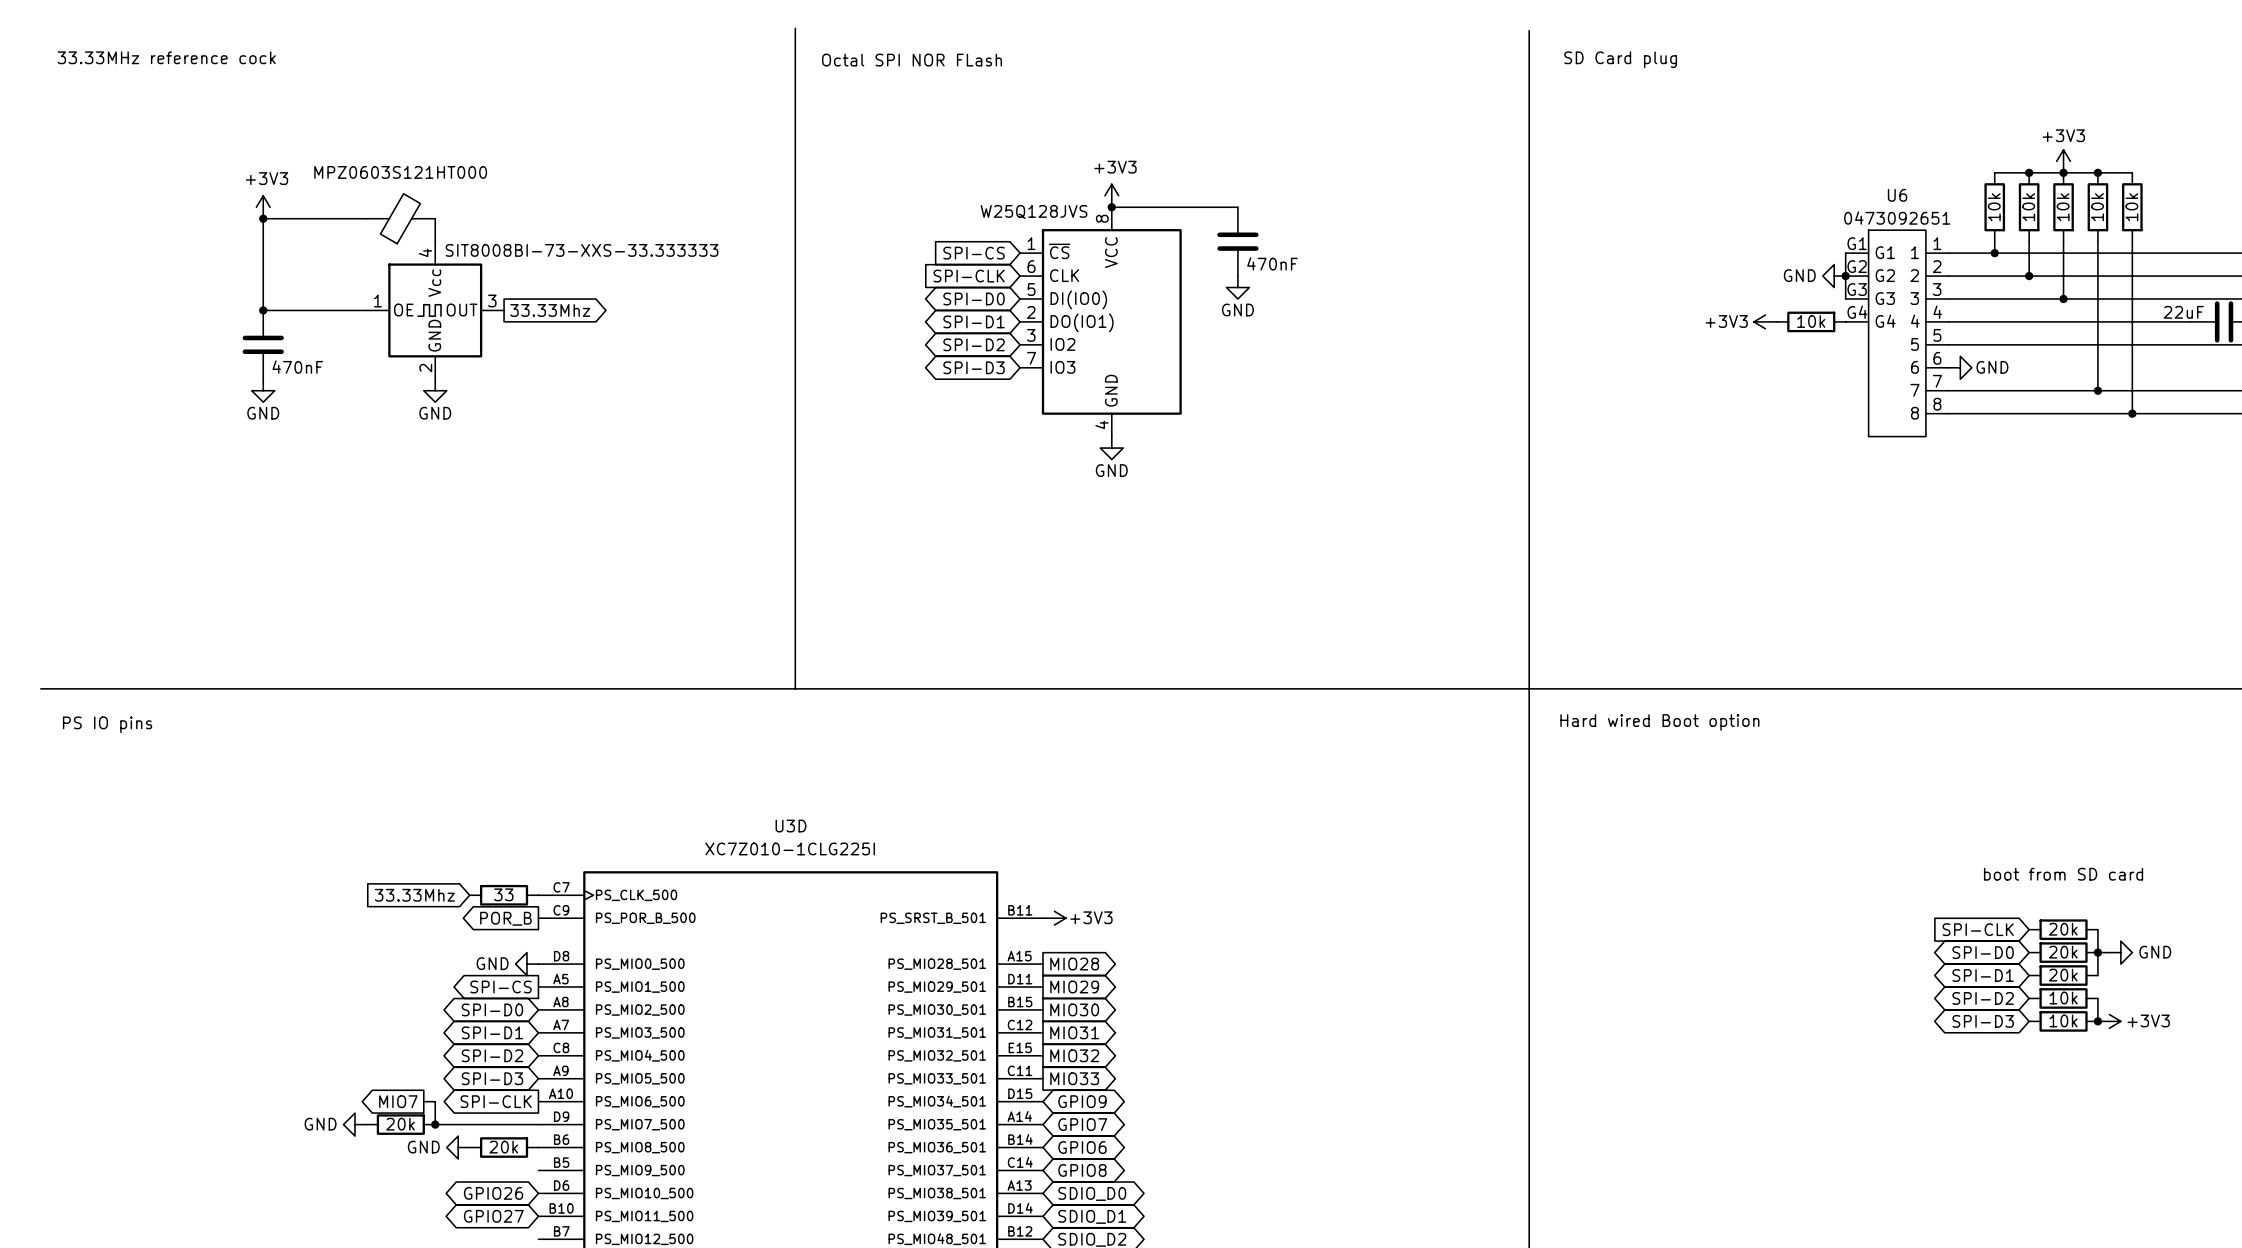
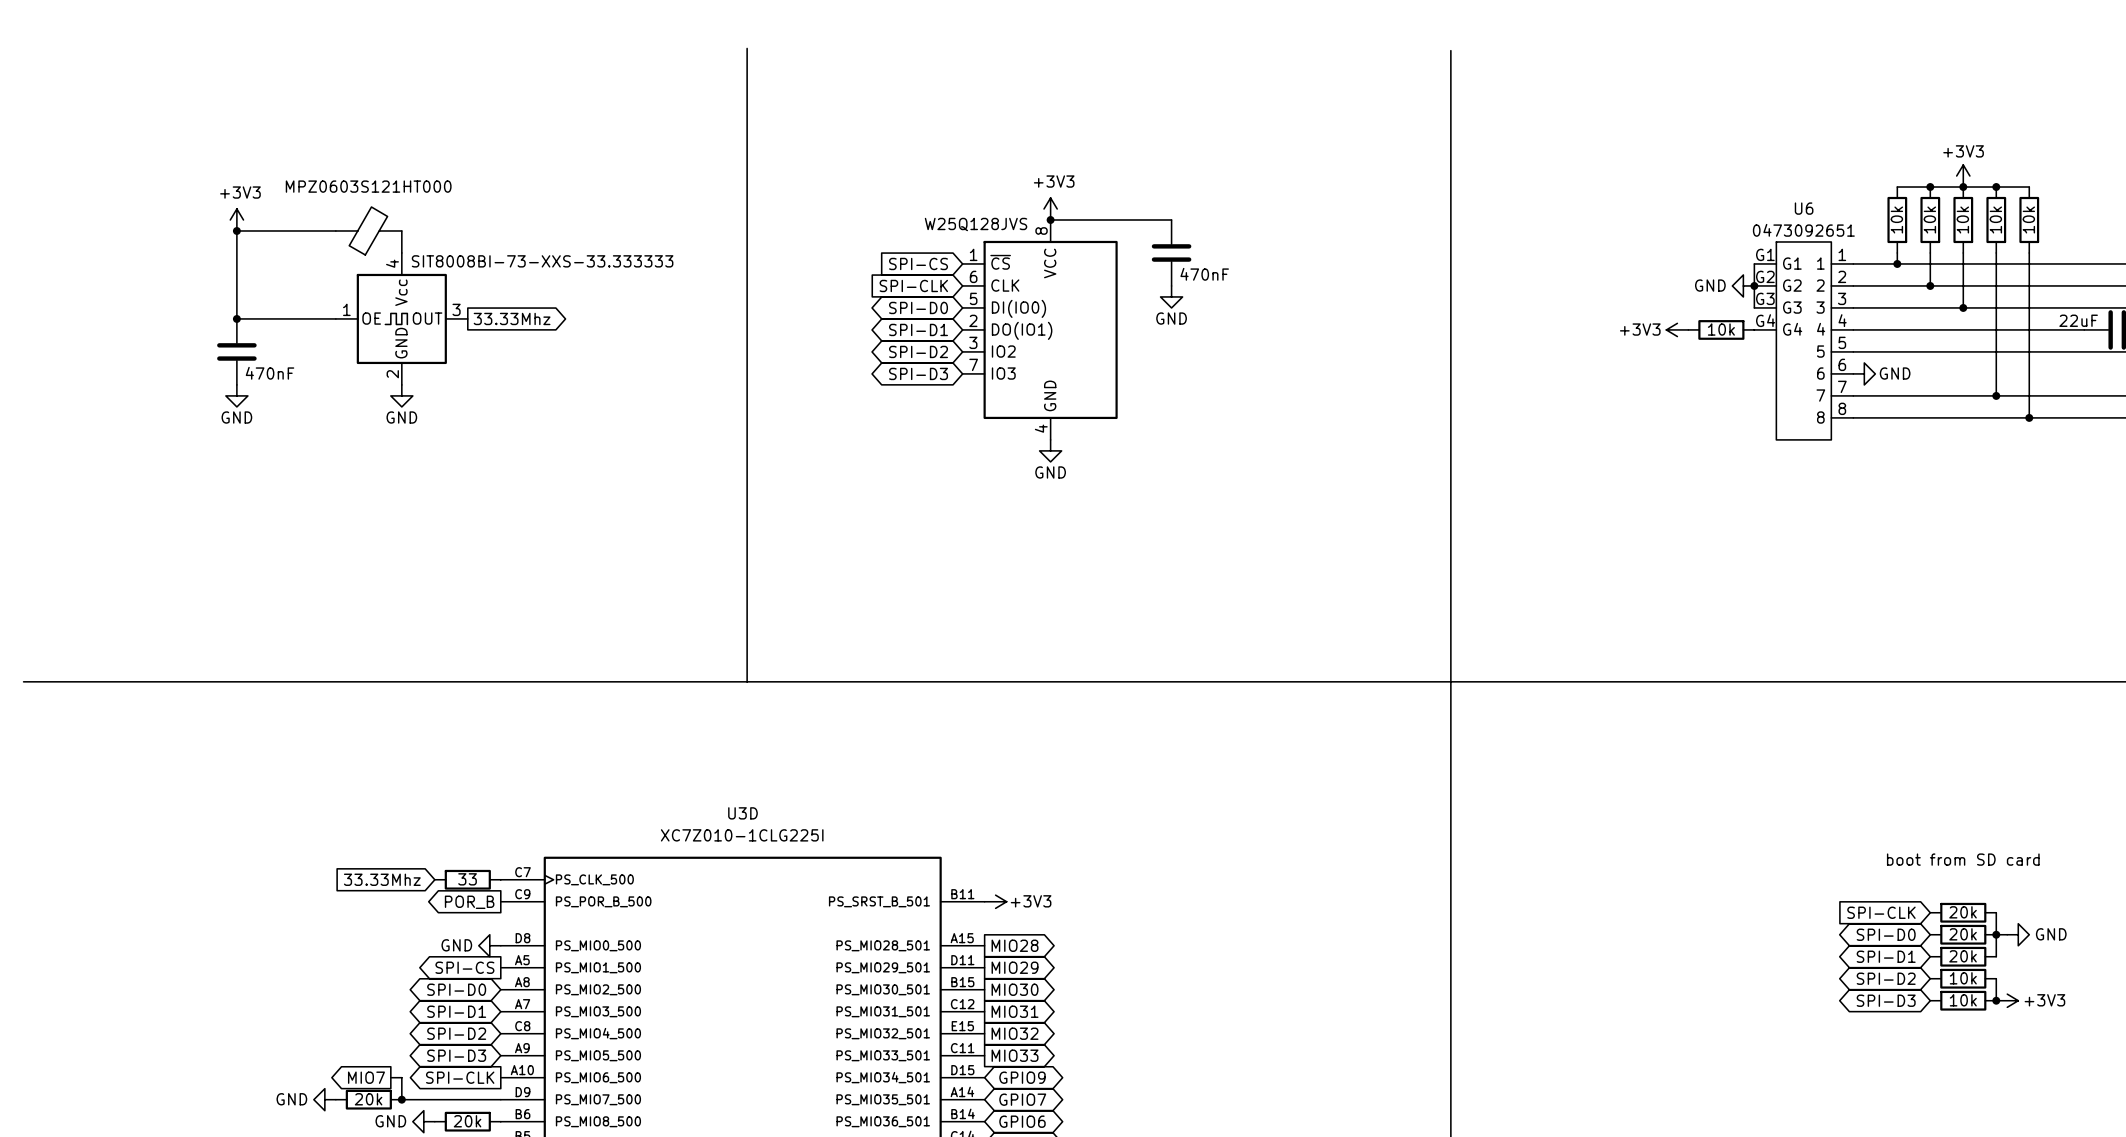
text: 33.33MHz reference cock (166, 57) -> none
text: SD Card plug (1620, 59) -> none
text: Octal SPI NOR FLash (912, 60) -> none
text: Hard wired Boot option (1659, 722) -> none
text: PS IO pins (107, 724) -> none

